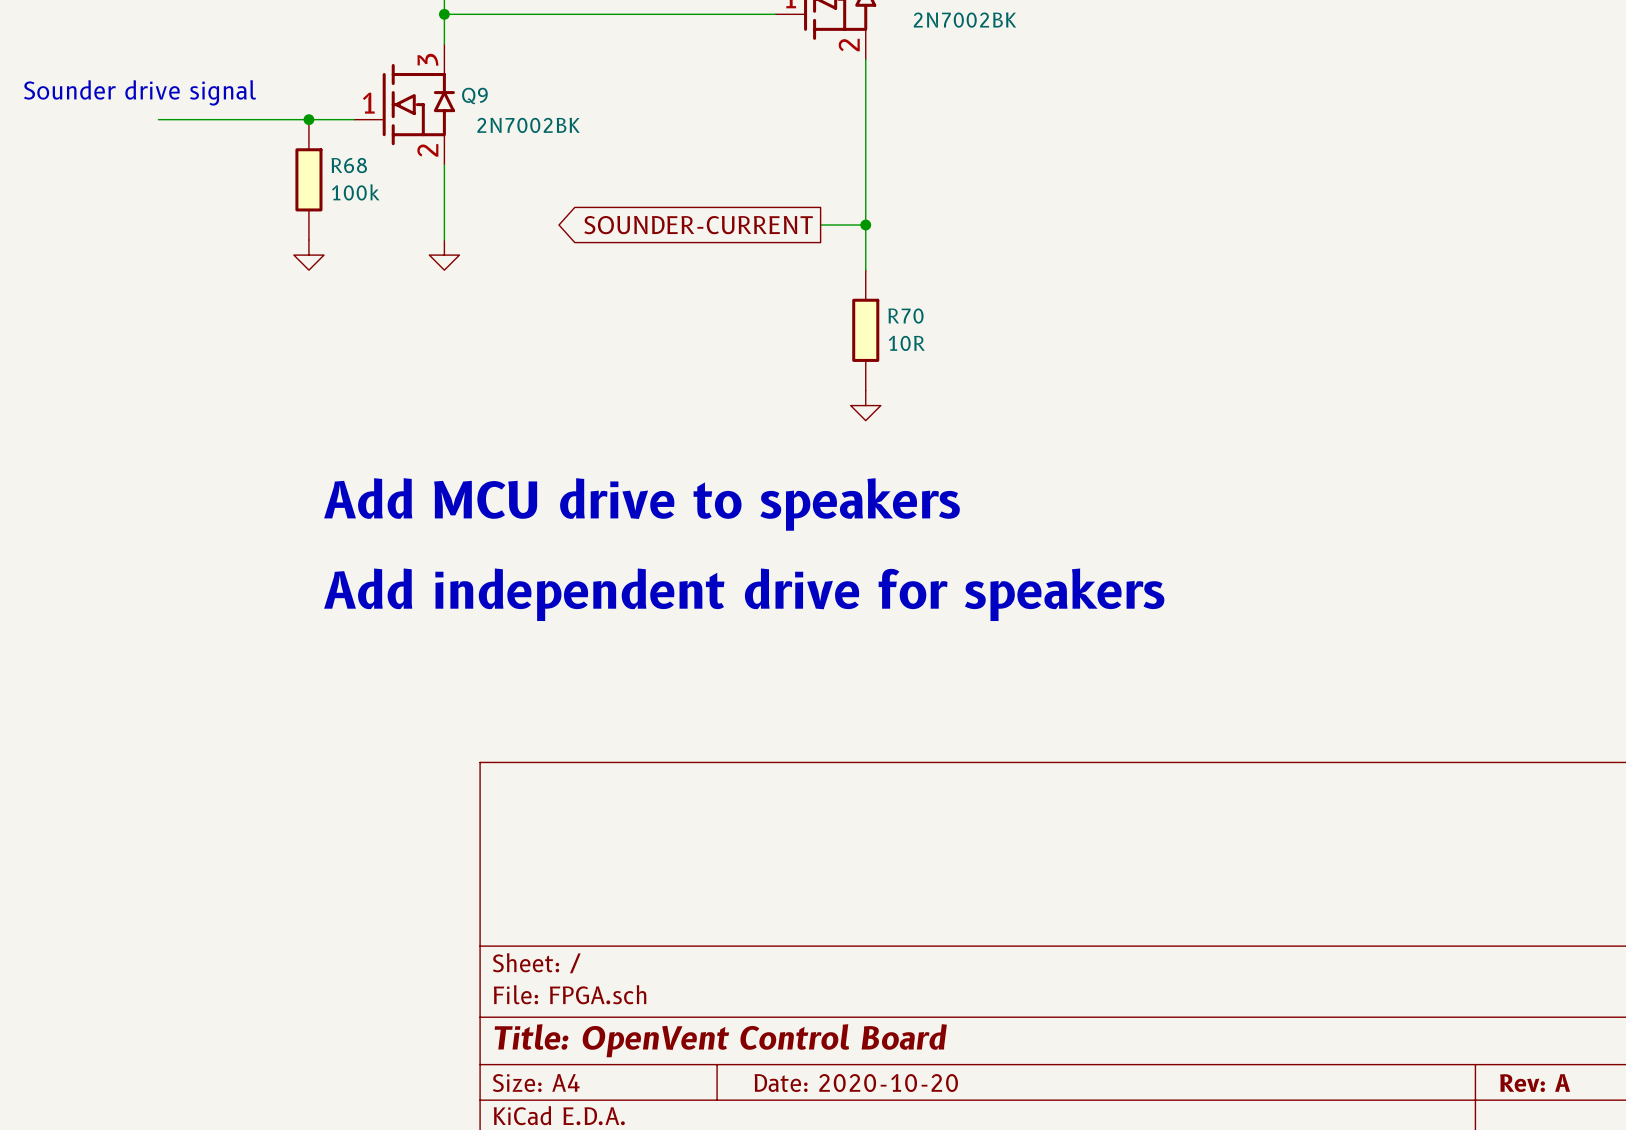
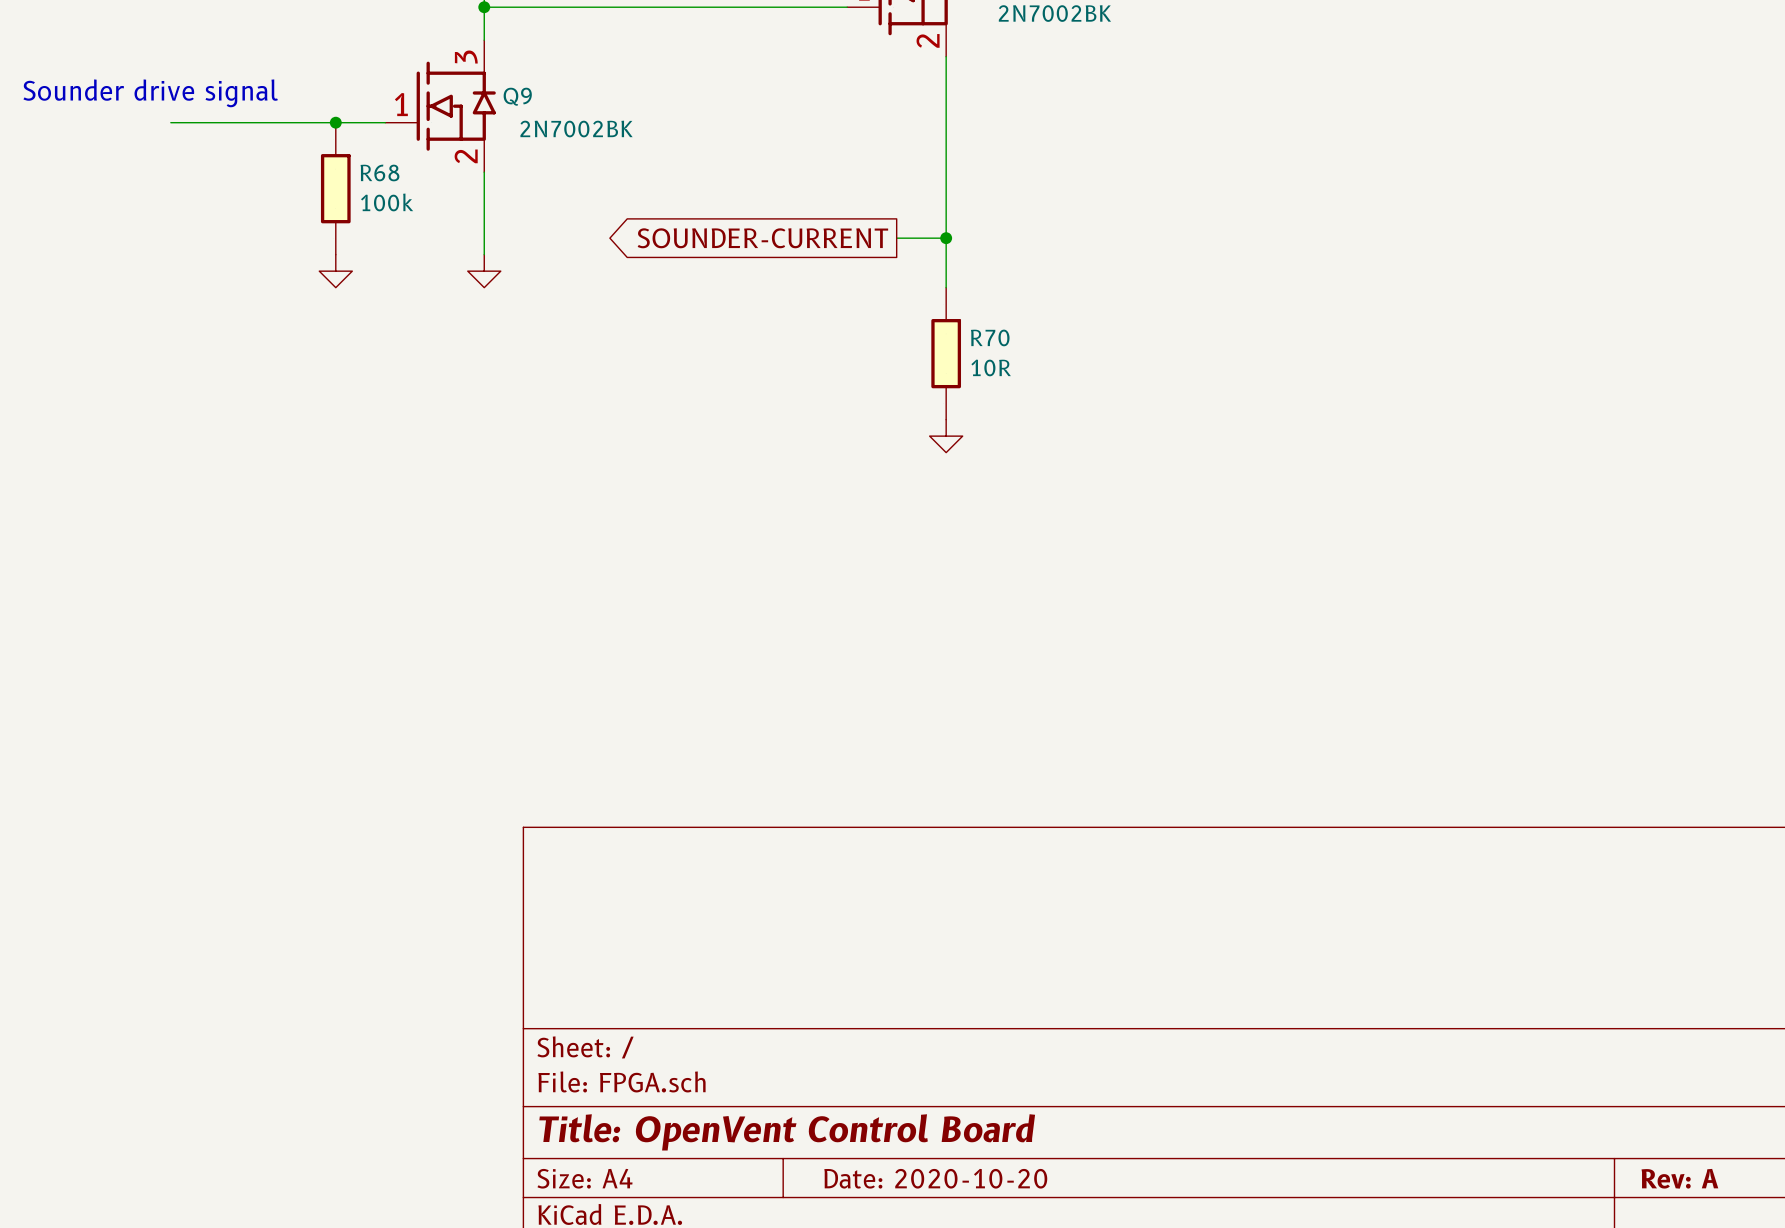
text: Add MCU drive to speakers (641, 504) -> none
text: Add independent drive for speakers (744, 594) -> none

